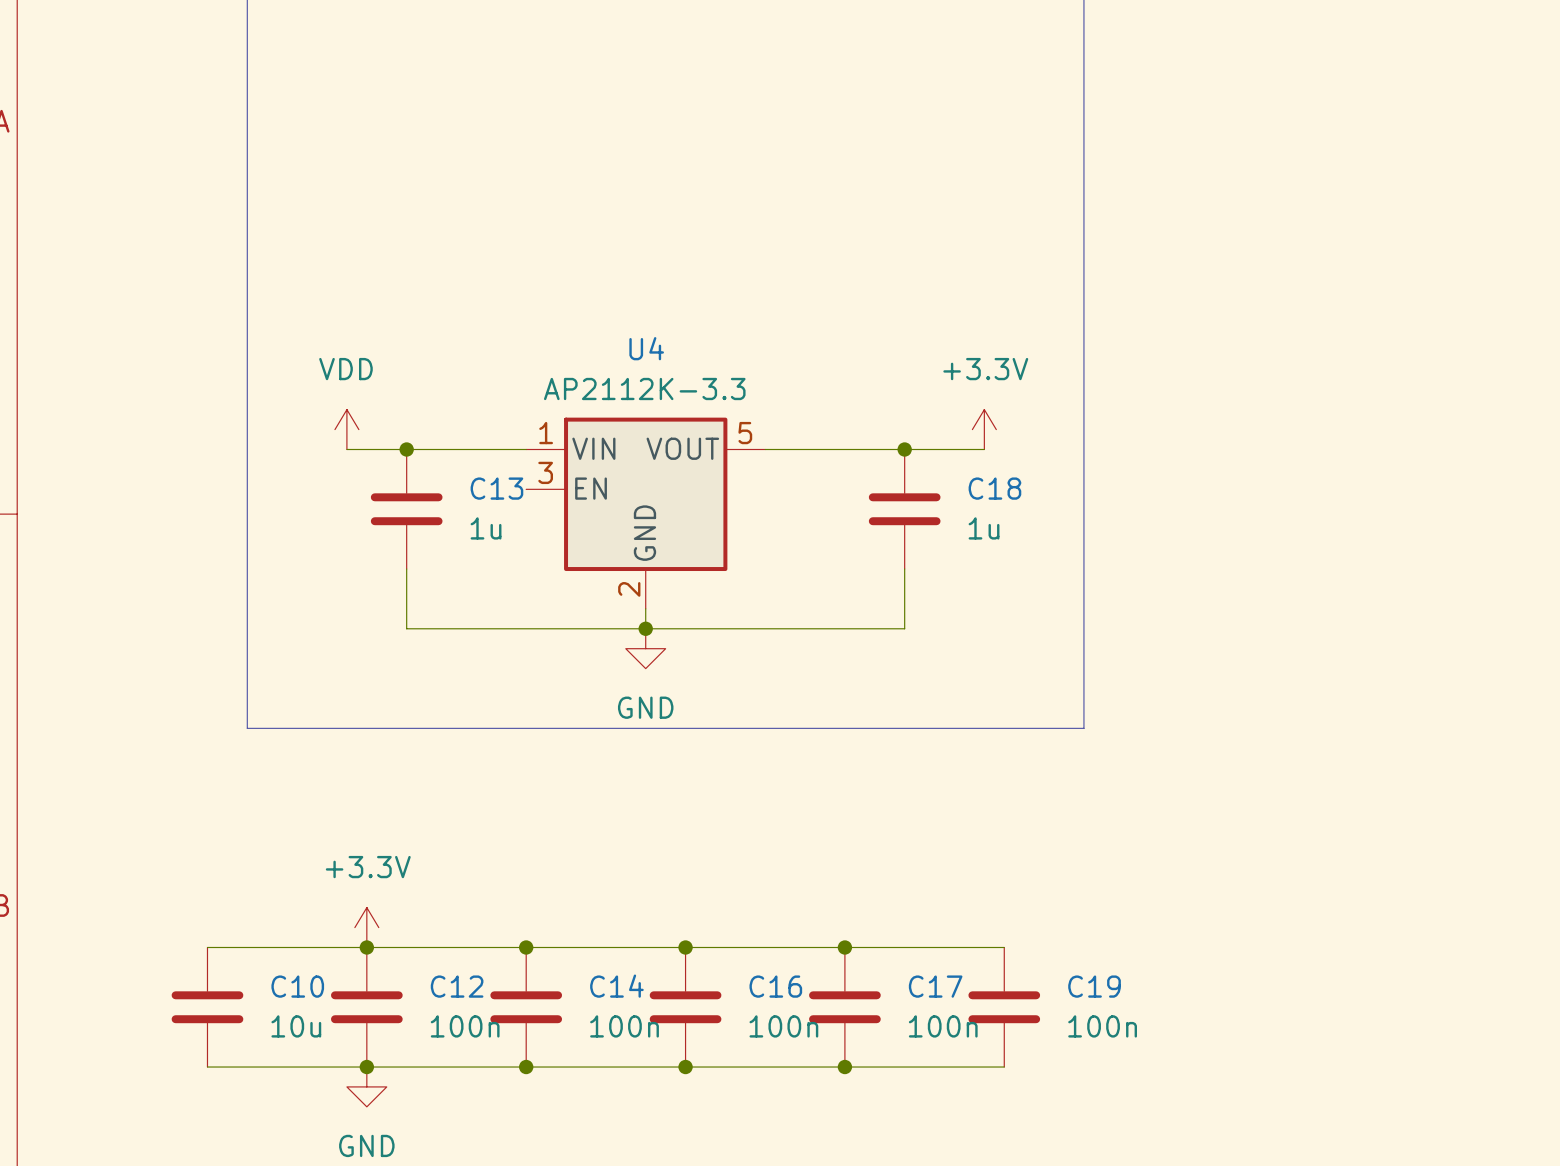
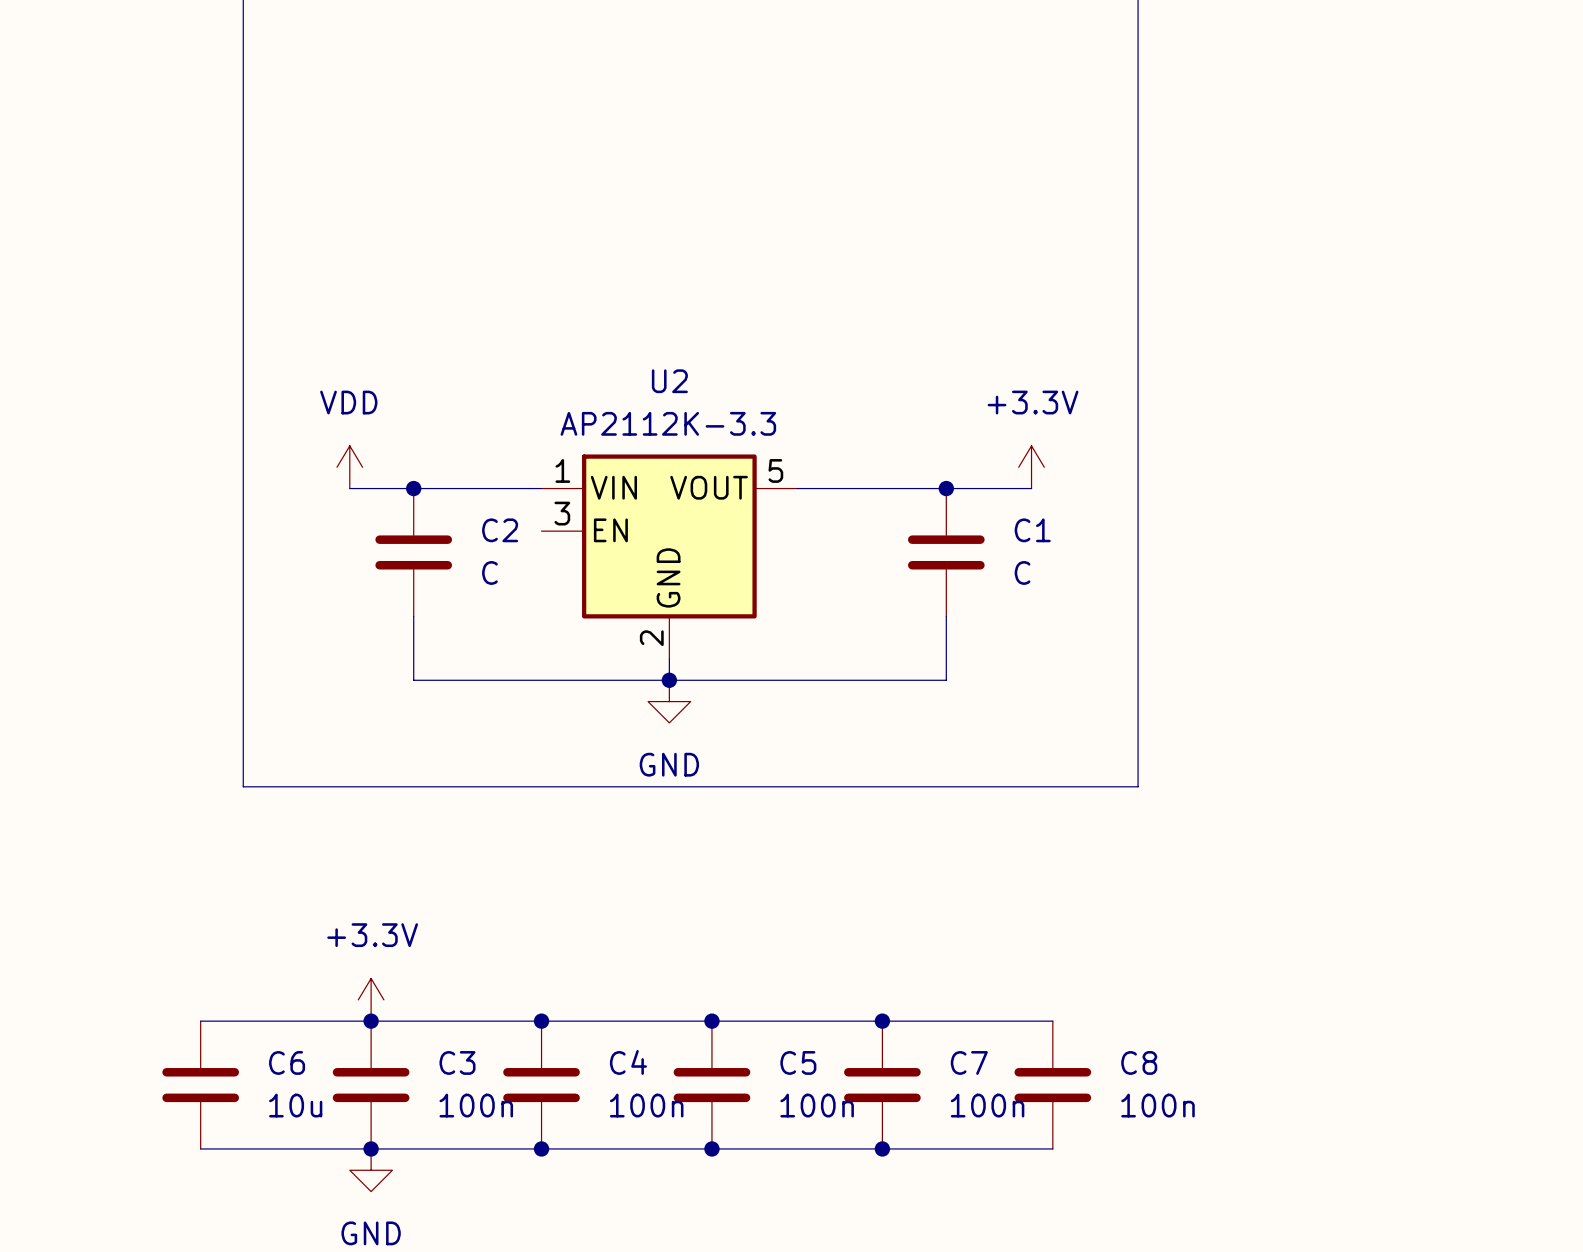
U4 name: U4 (646, 348) -> U2 (669, 381)
C13 name: C13 (496, 488) -> C2 (500, 530)
C18 name: C18 (994, 488) -> C1 (1032, 530)
C13 value: 1u (486, 528) -> C (489, 572)
C18 value: 1u (984, 528) -> C (1022, 572)
C10 name: C10 (297, 986) -> C6 (287, 1062)
C12 name: C12 (457, 986) -> C3 (457, 1062)
C14 name: C14 (616, 986) -> C4 (628, 1062)
C16 name: C16 (775, 986) -> C5 (798, 1062)
C17 name: C17 (935, 986) -> C7 (969, 1062)
C19 name: C19 (1094, 986) -> C8 (1139, 1062)

